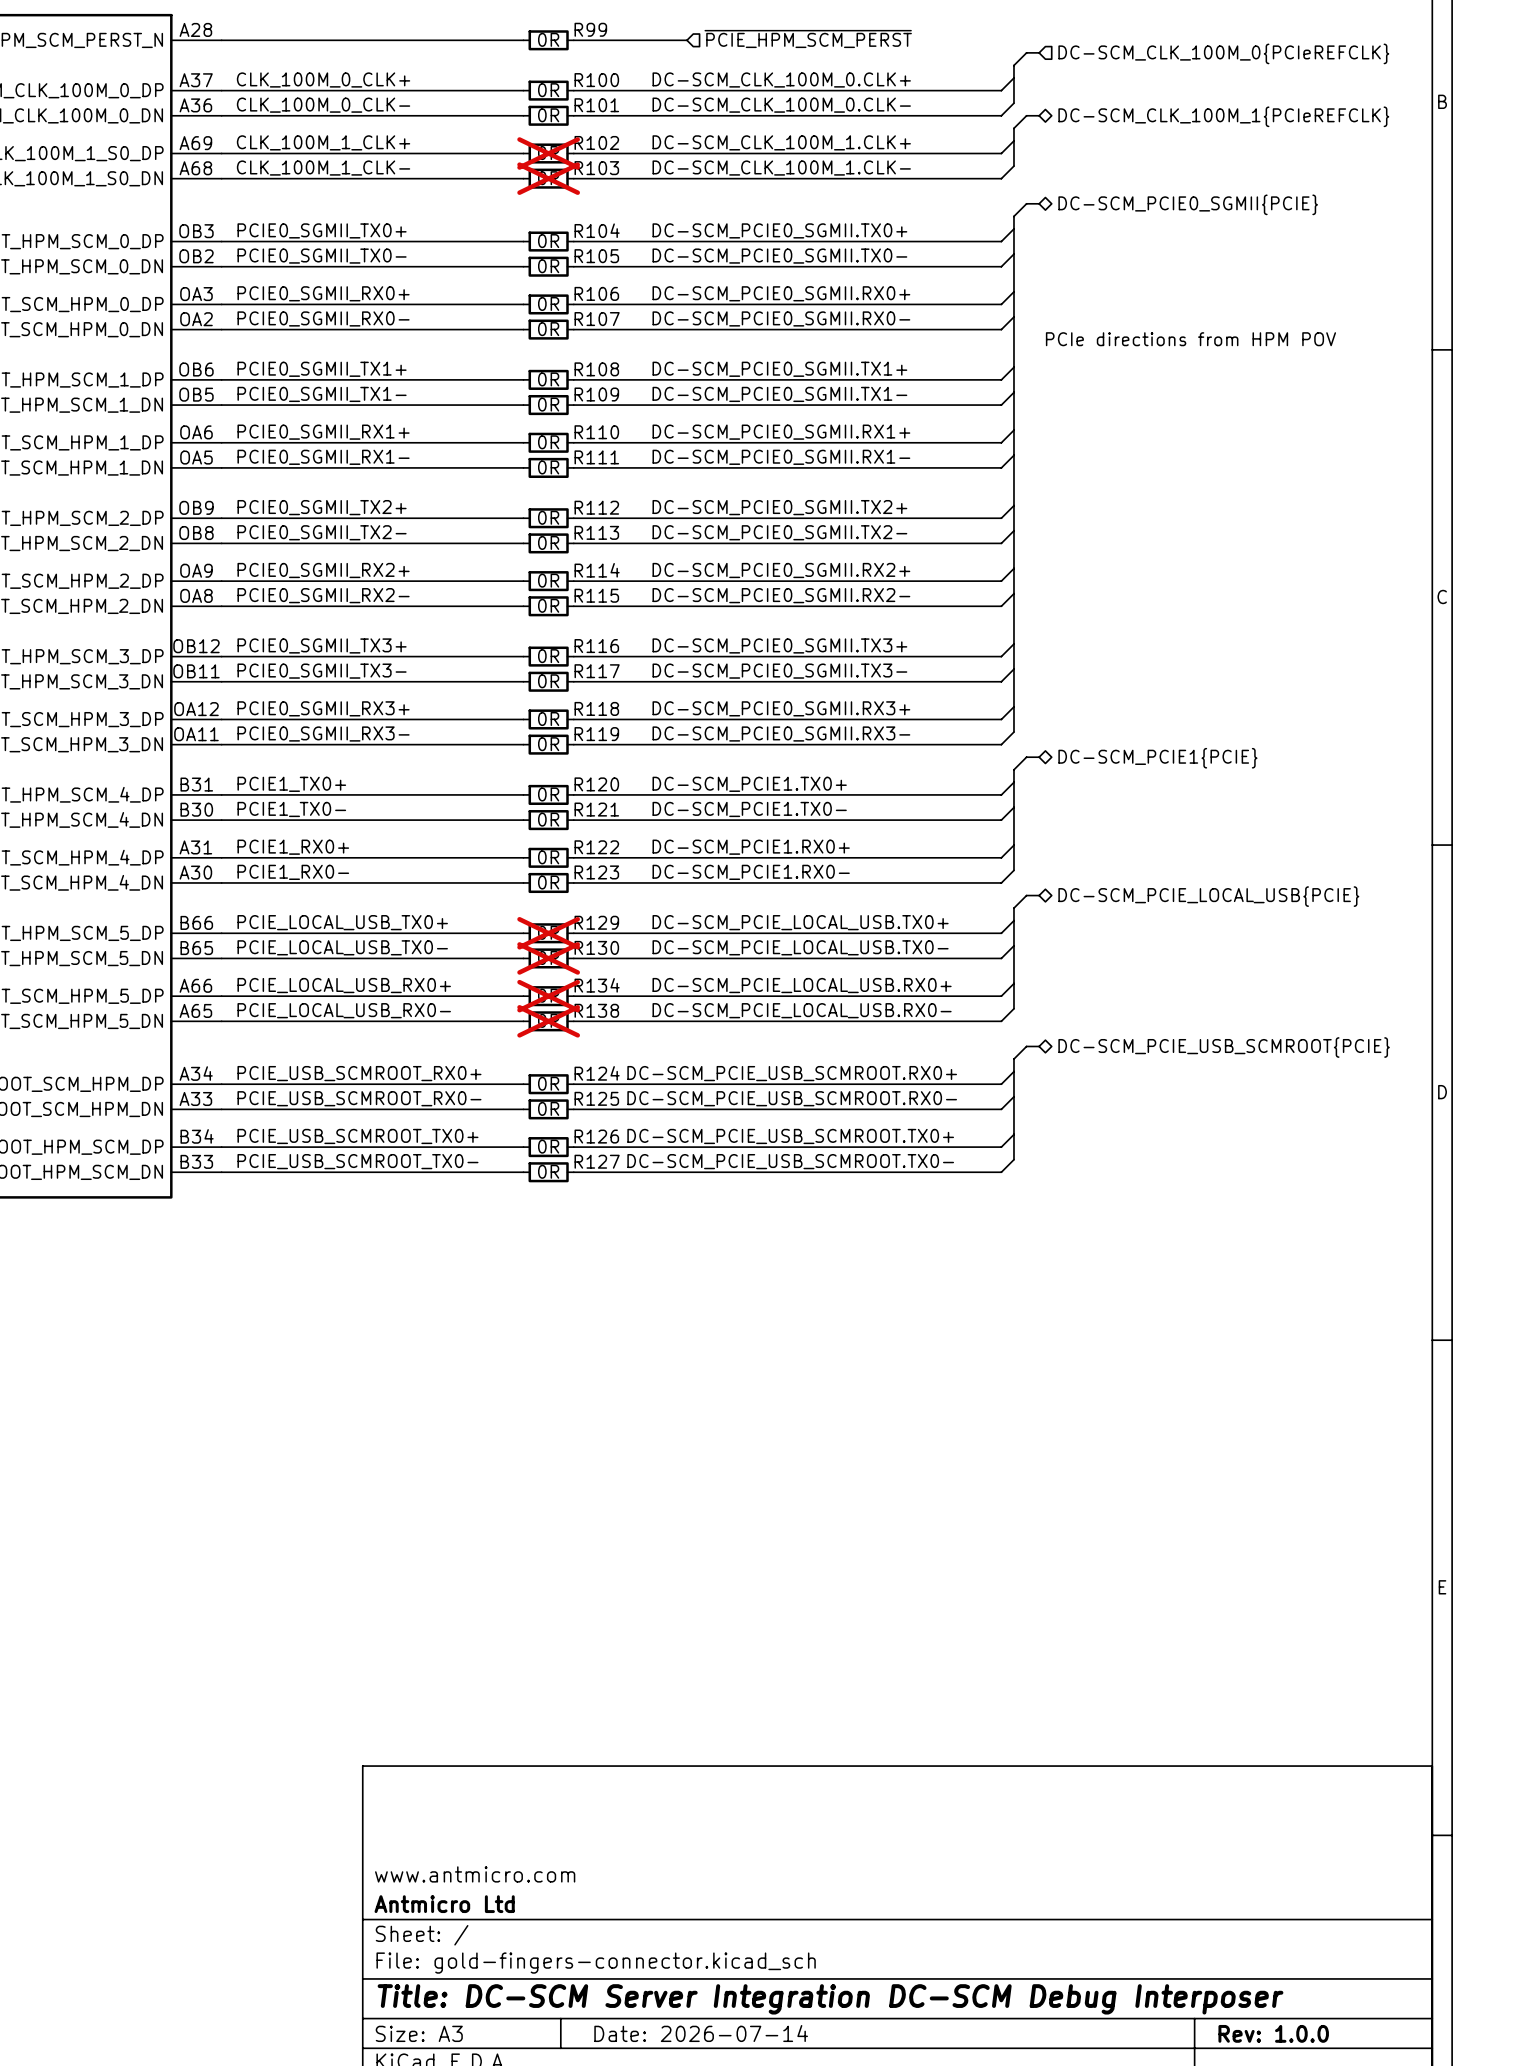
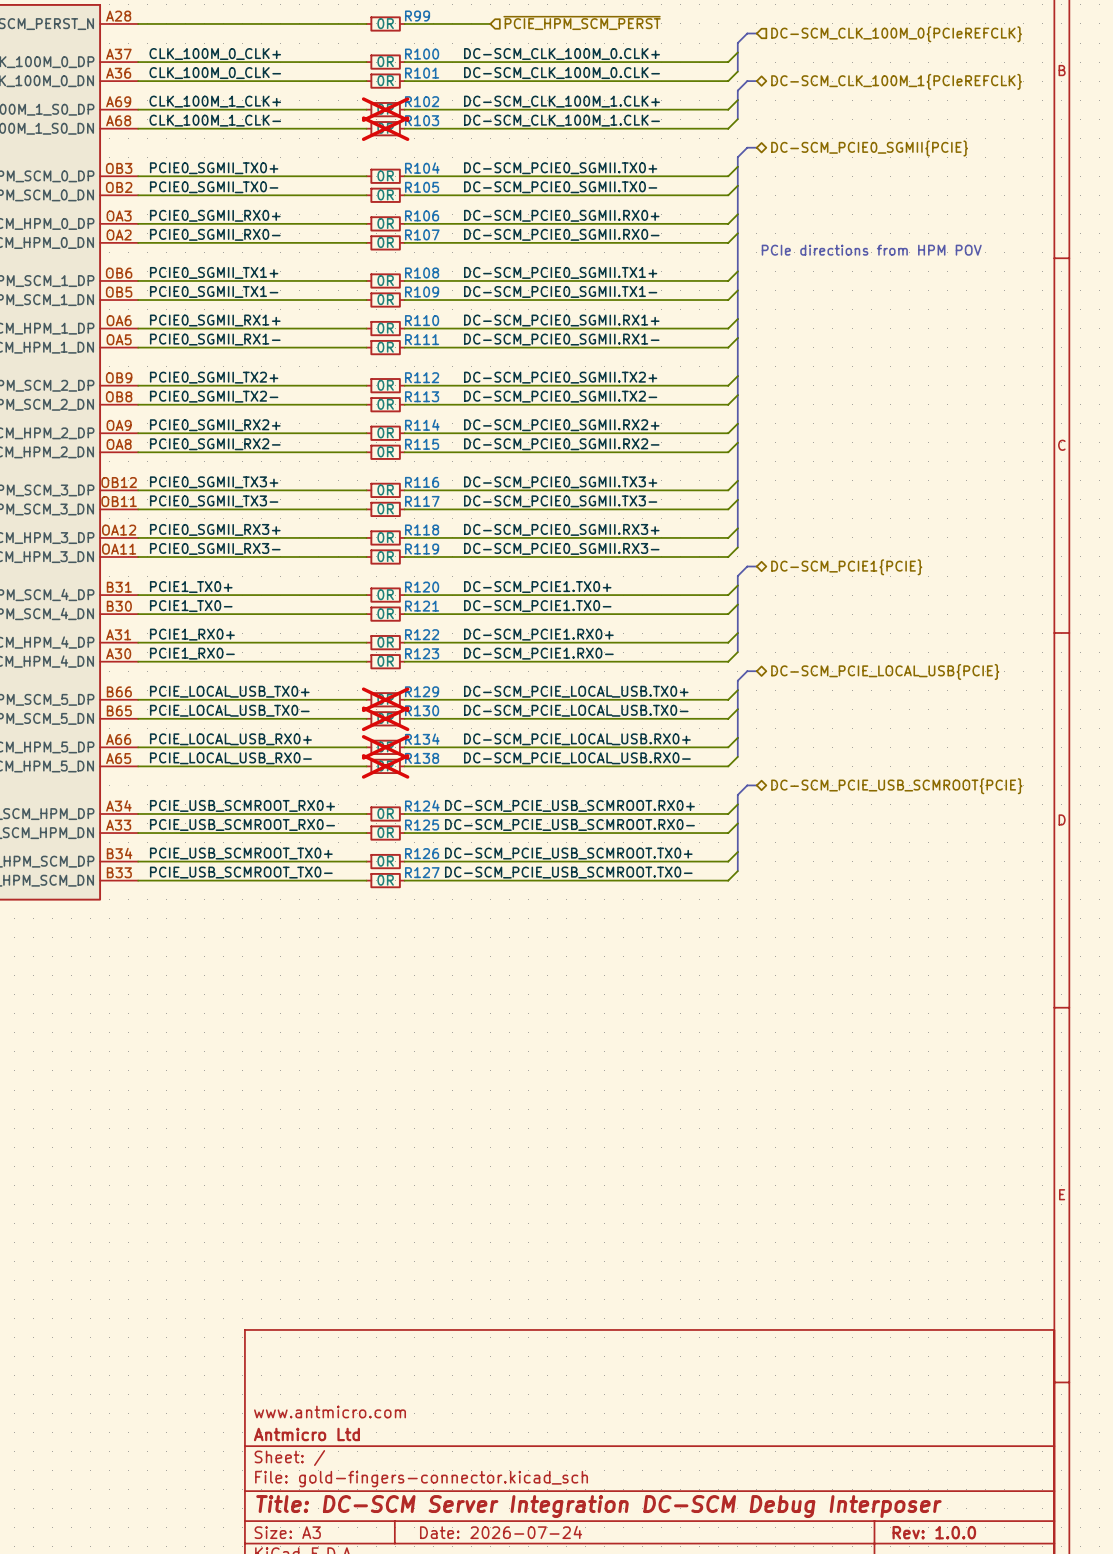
title block: Date: 2026-07-14 (701, 2033) -> Date: 2026-07-24 (501, 1532)

